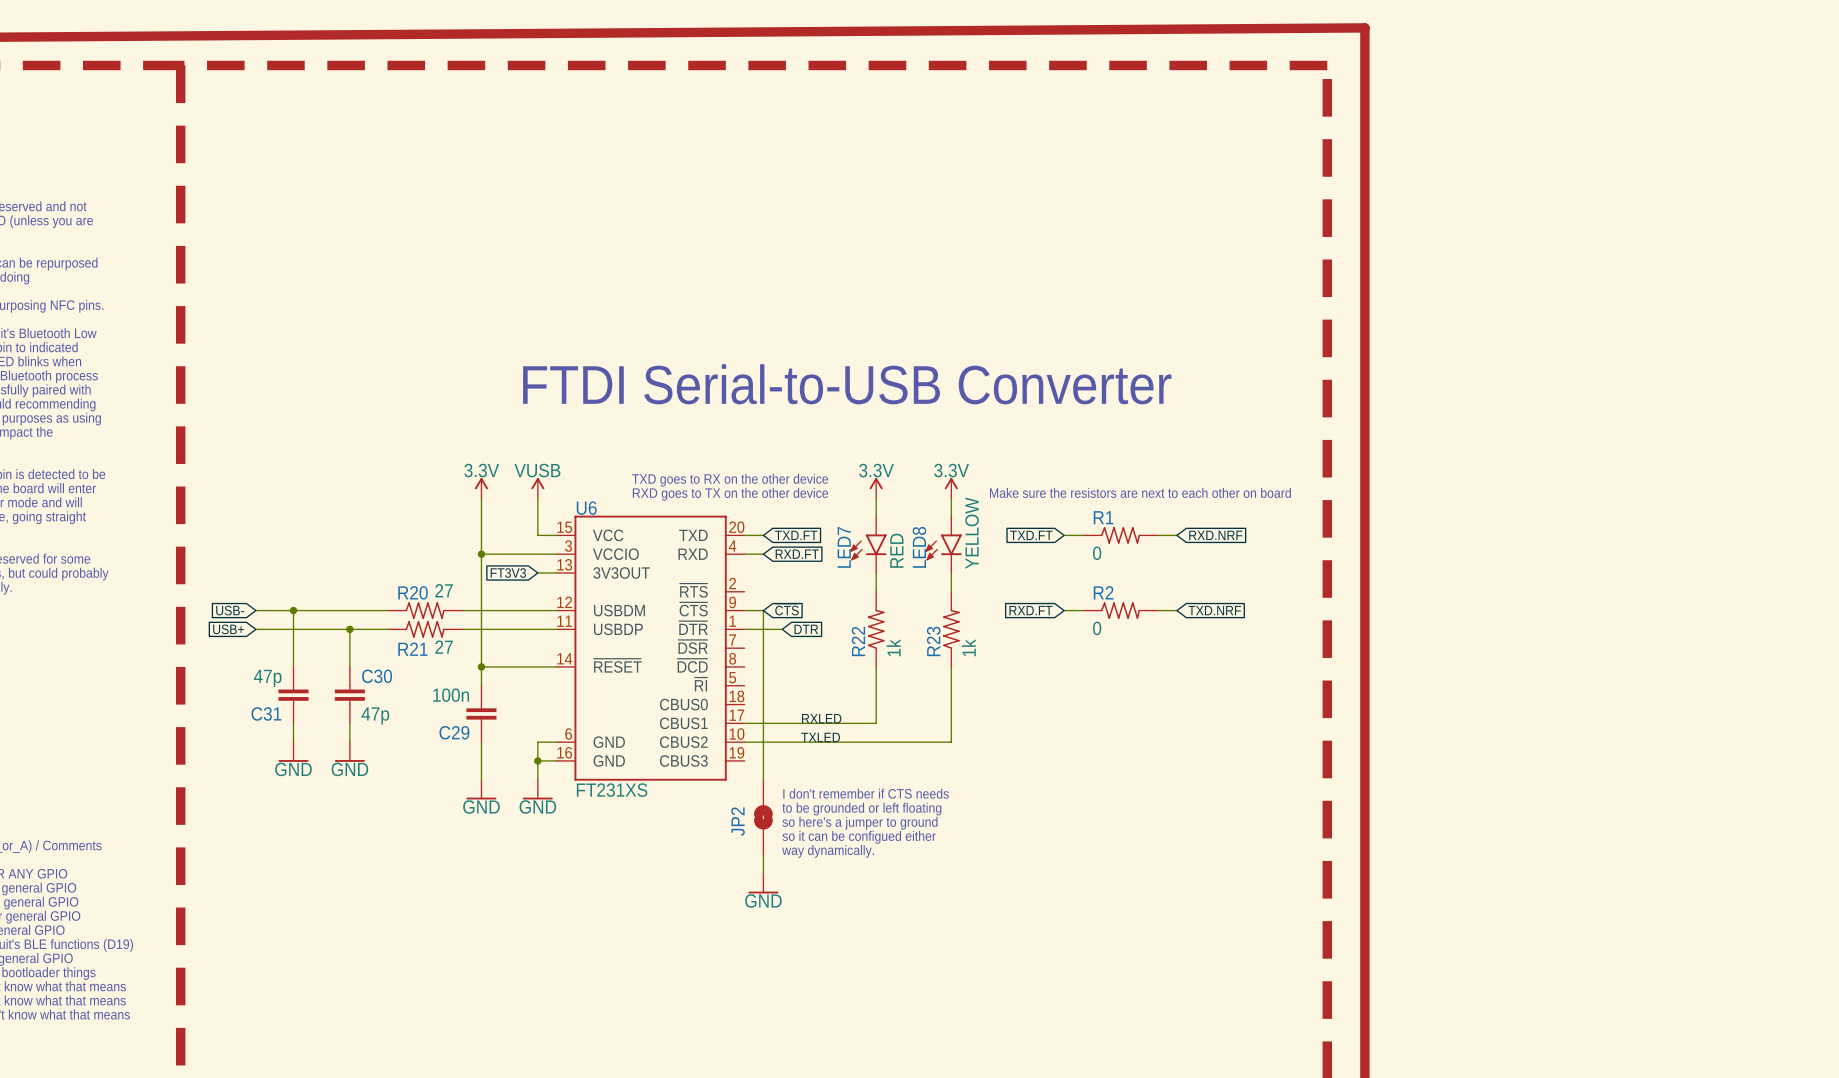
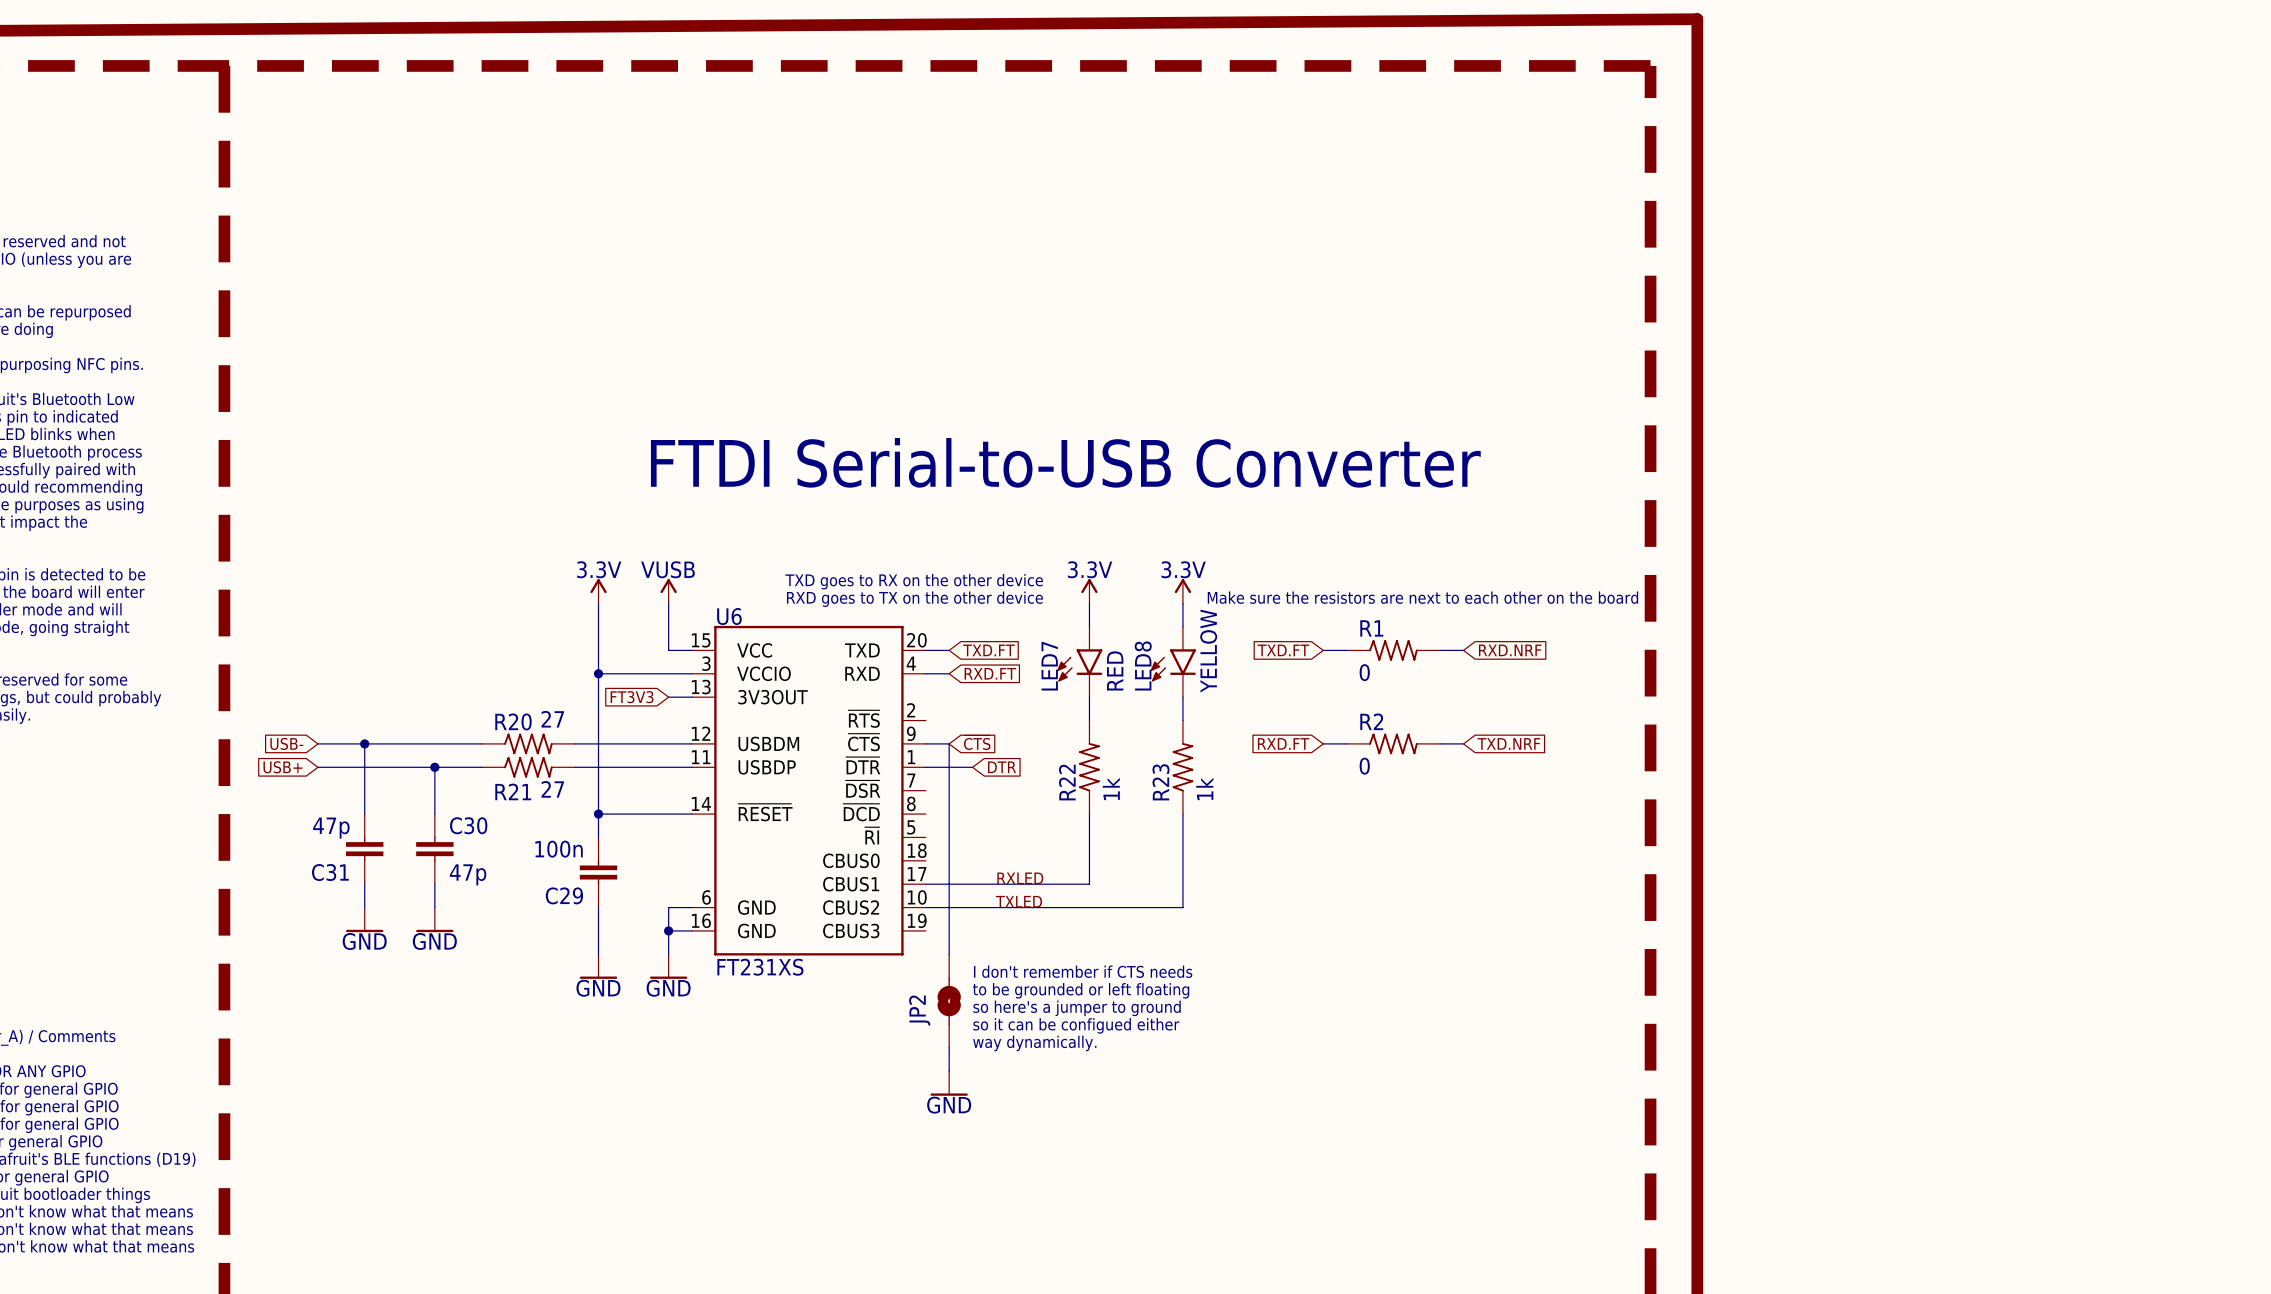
text: Make sure the resistors are next to each other on board (1140, 492) -> Make sure the resistors are next to each other on the board (1422, 597)

